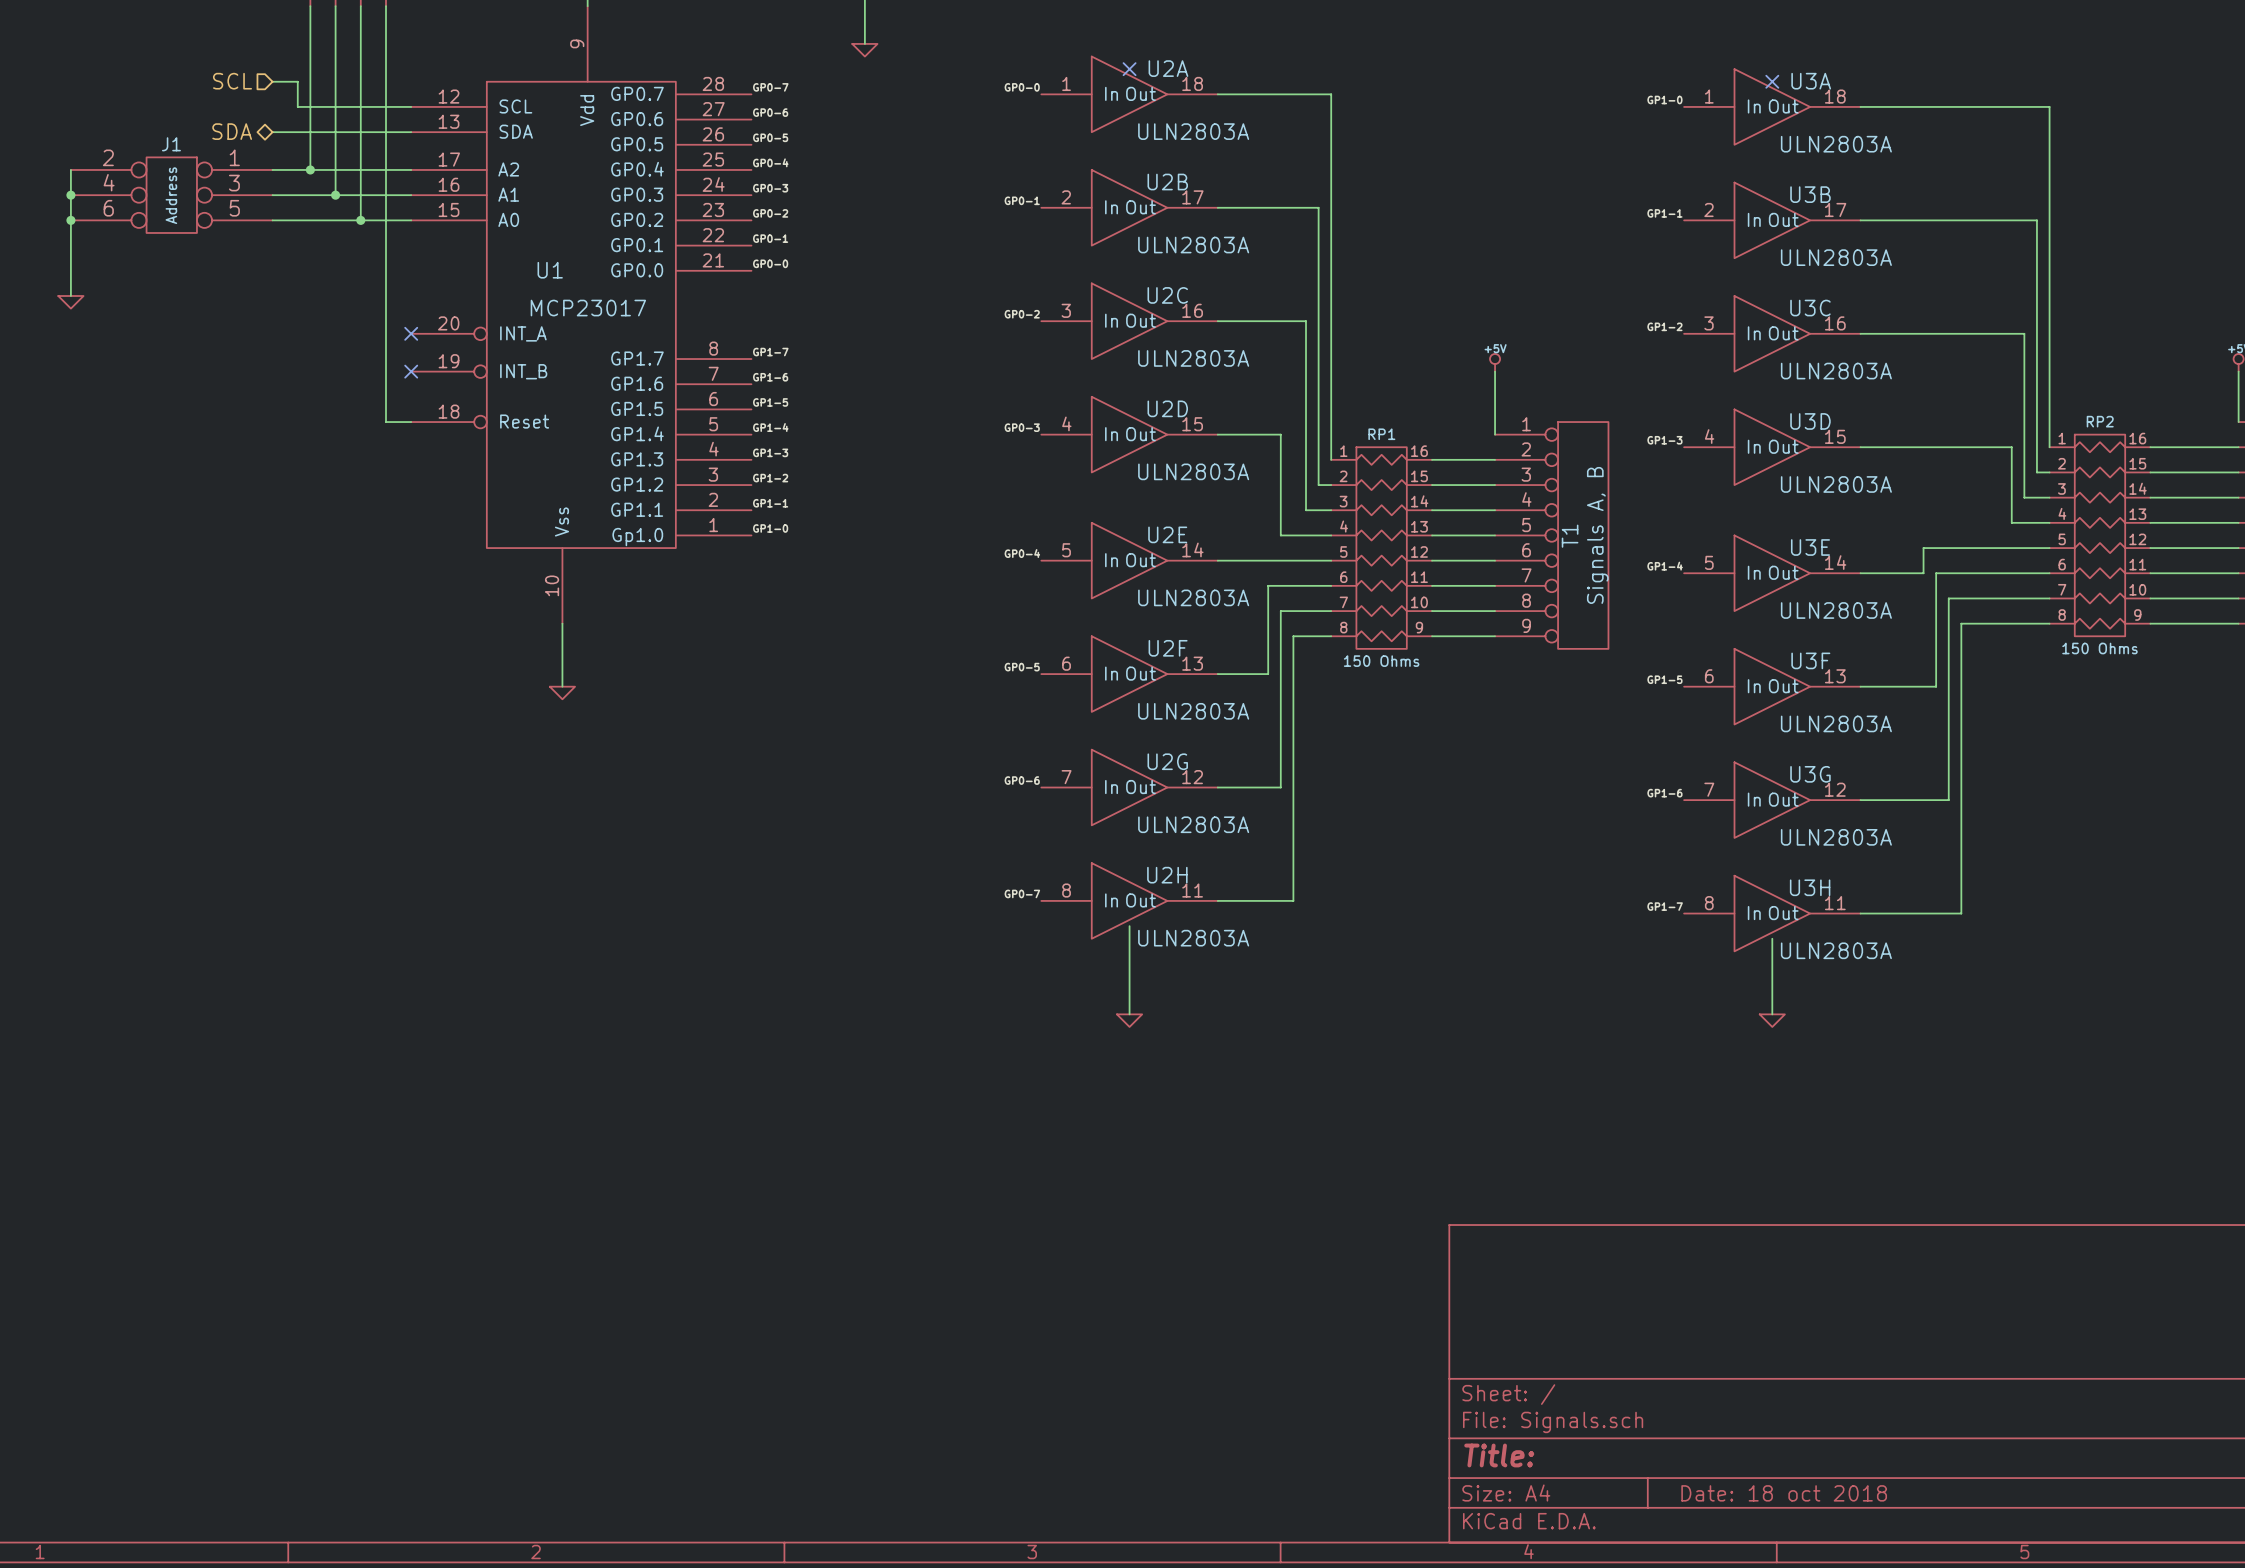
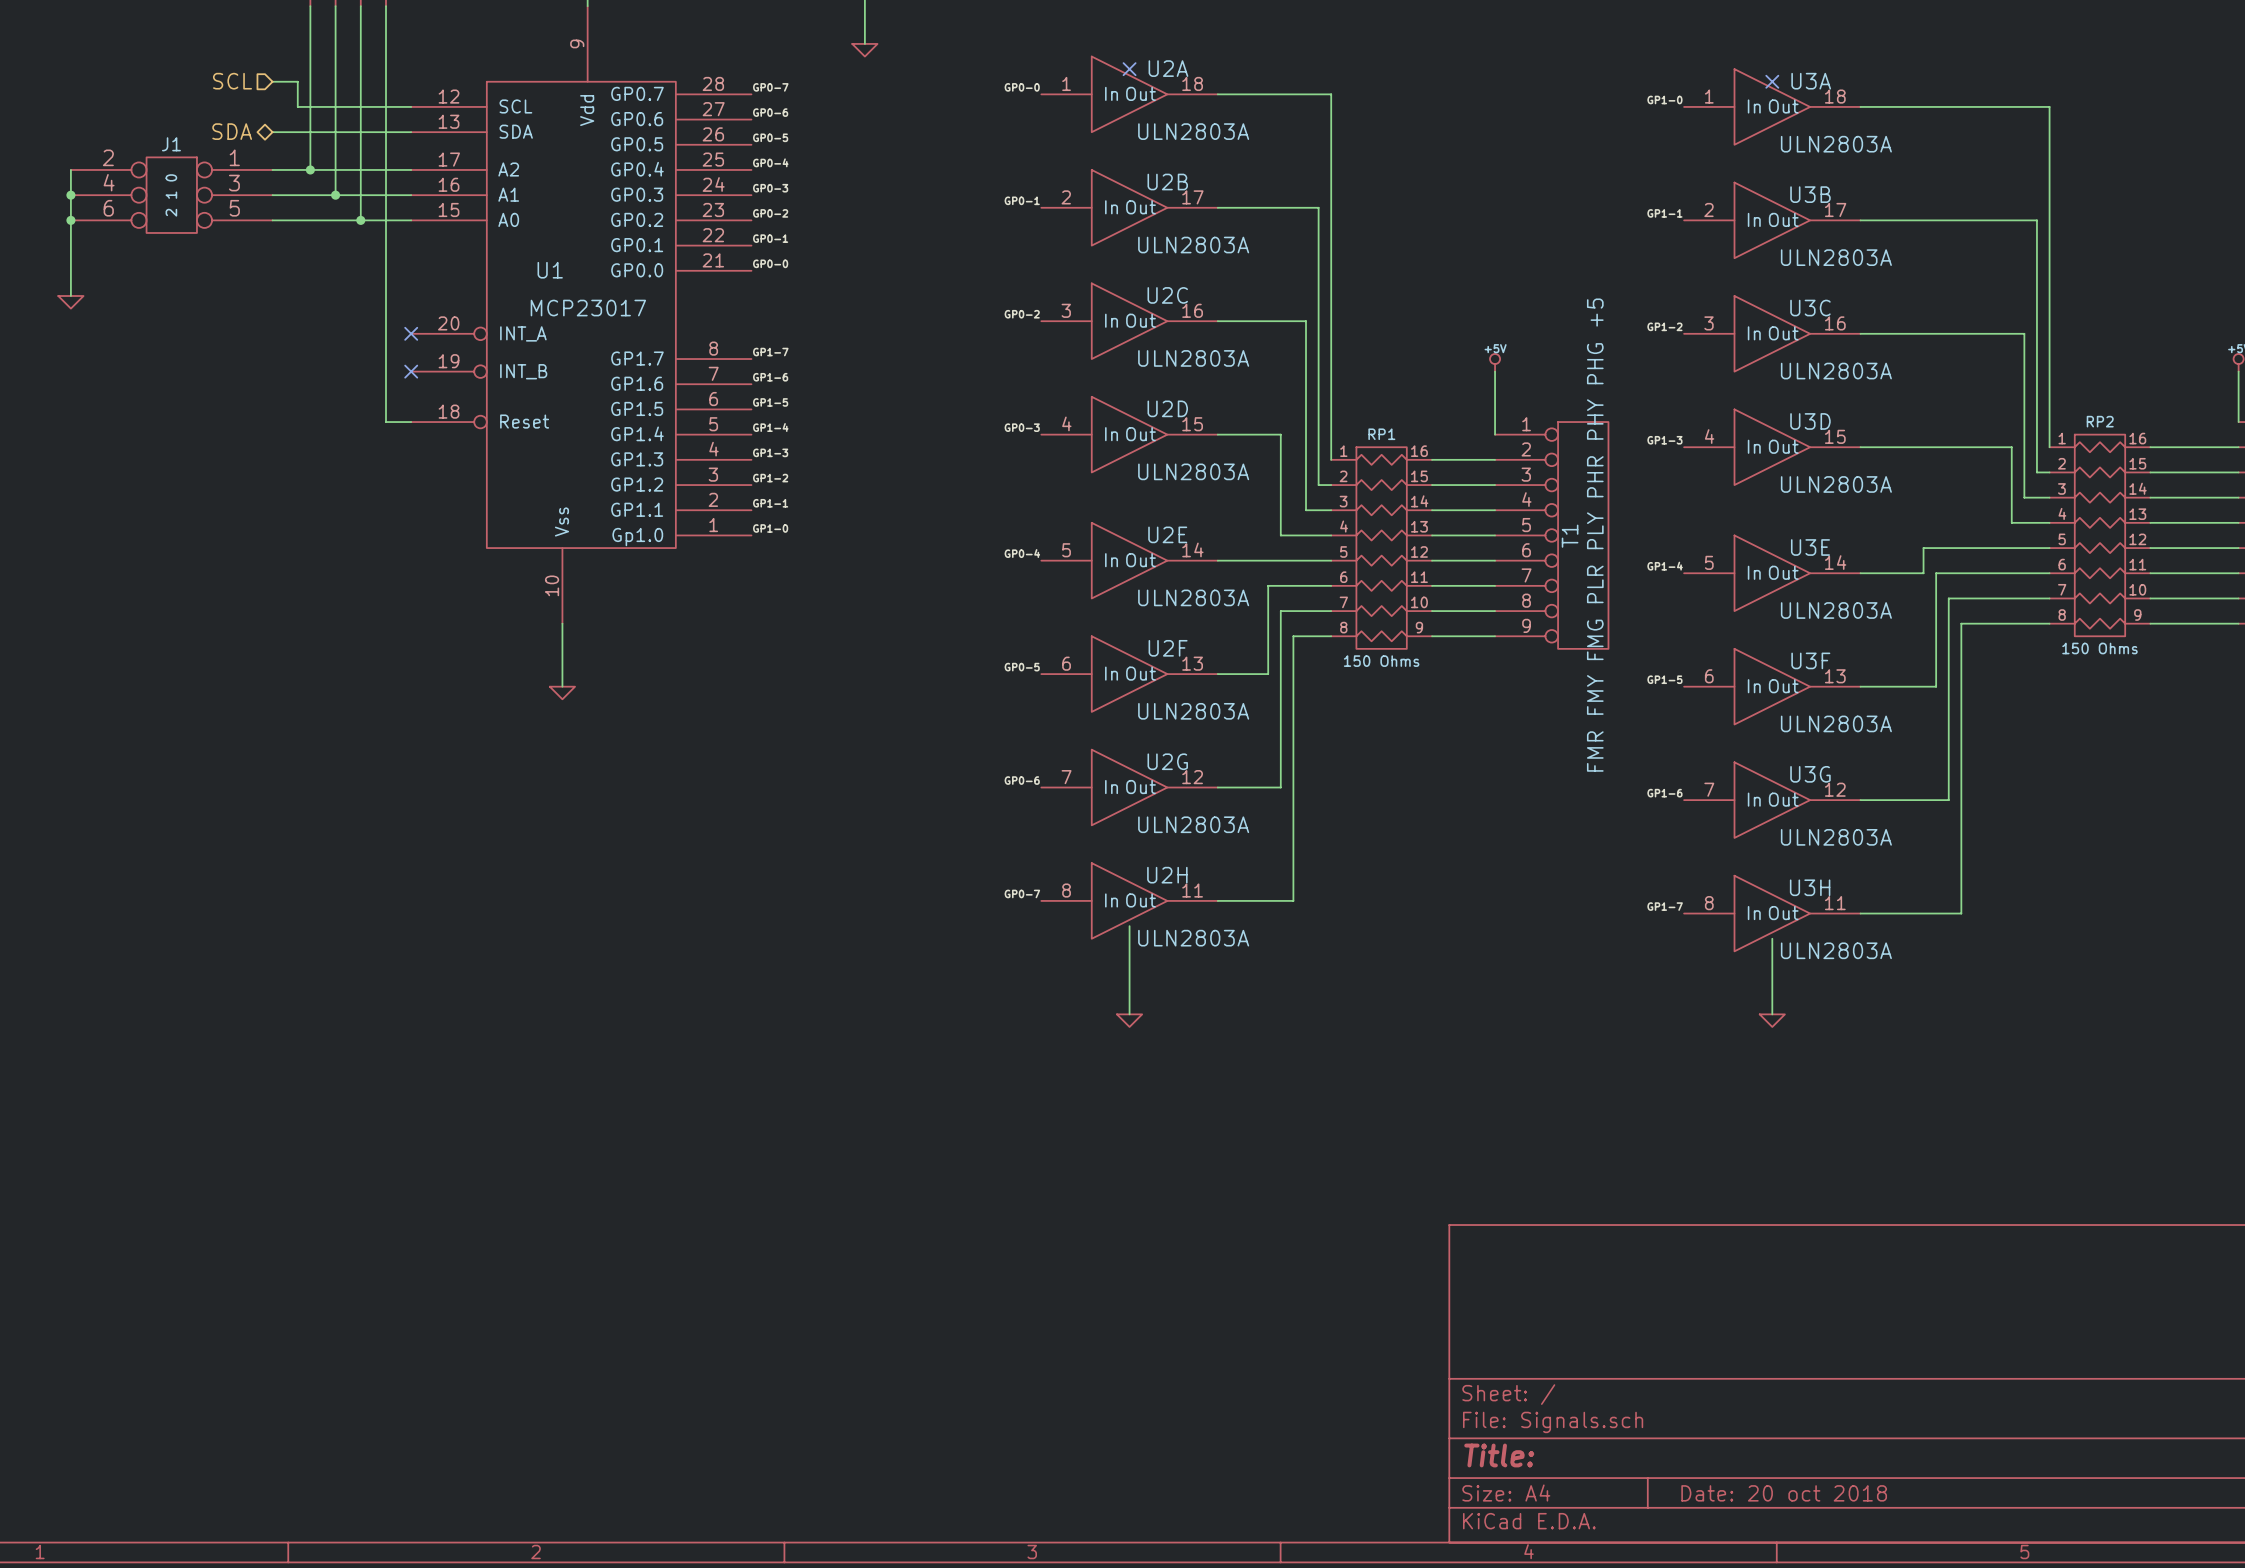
J1 value: Address (171, 195) -> 2 1 0 (171, 195)
T1 value: Signals A, B (1597, 535) -> FMR FMY FMG PLR PLY PHR PHY PHG +5 (1595, 535)
title block: Date: 18 oct 2018 (1784, 1493) -> Date: 20 oct 2018 (1784, 1493)

